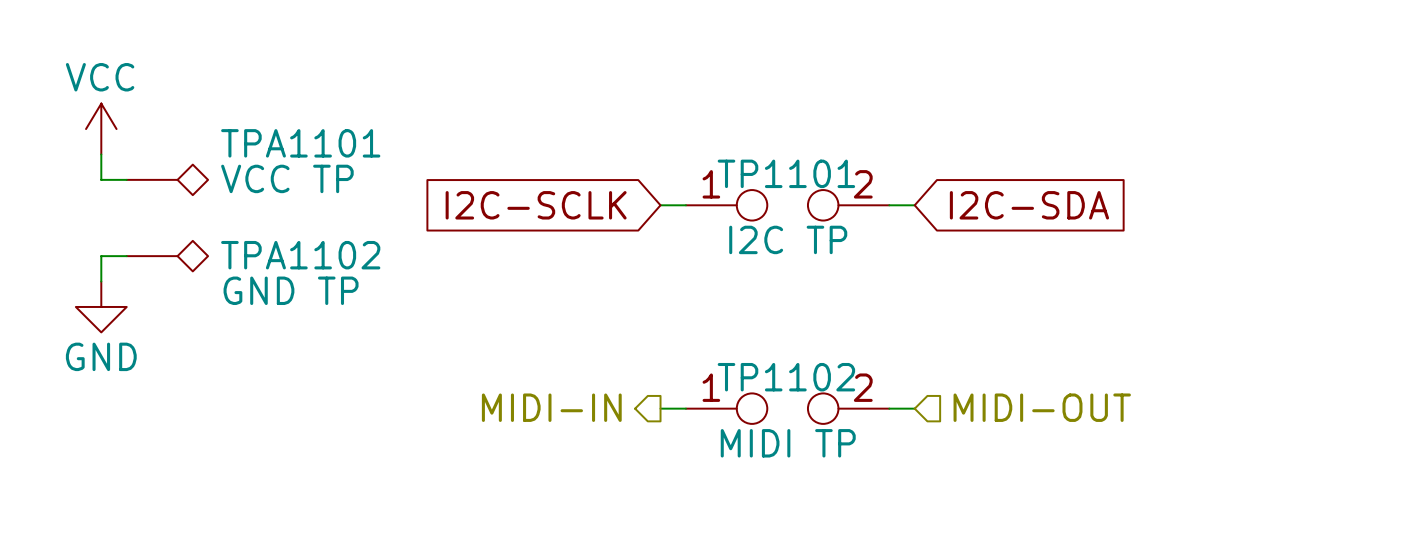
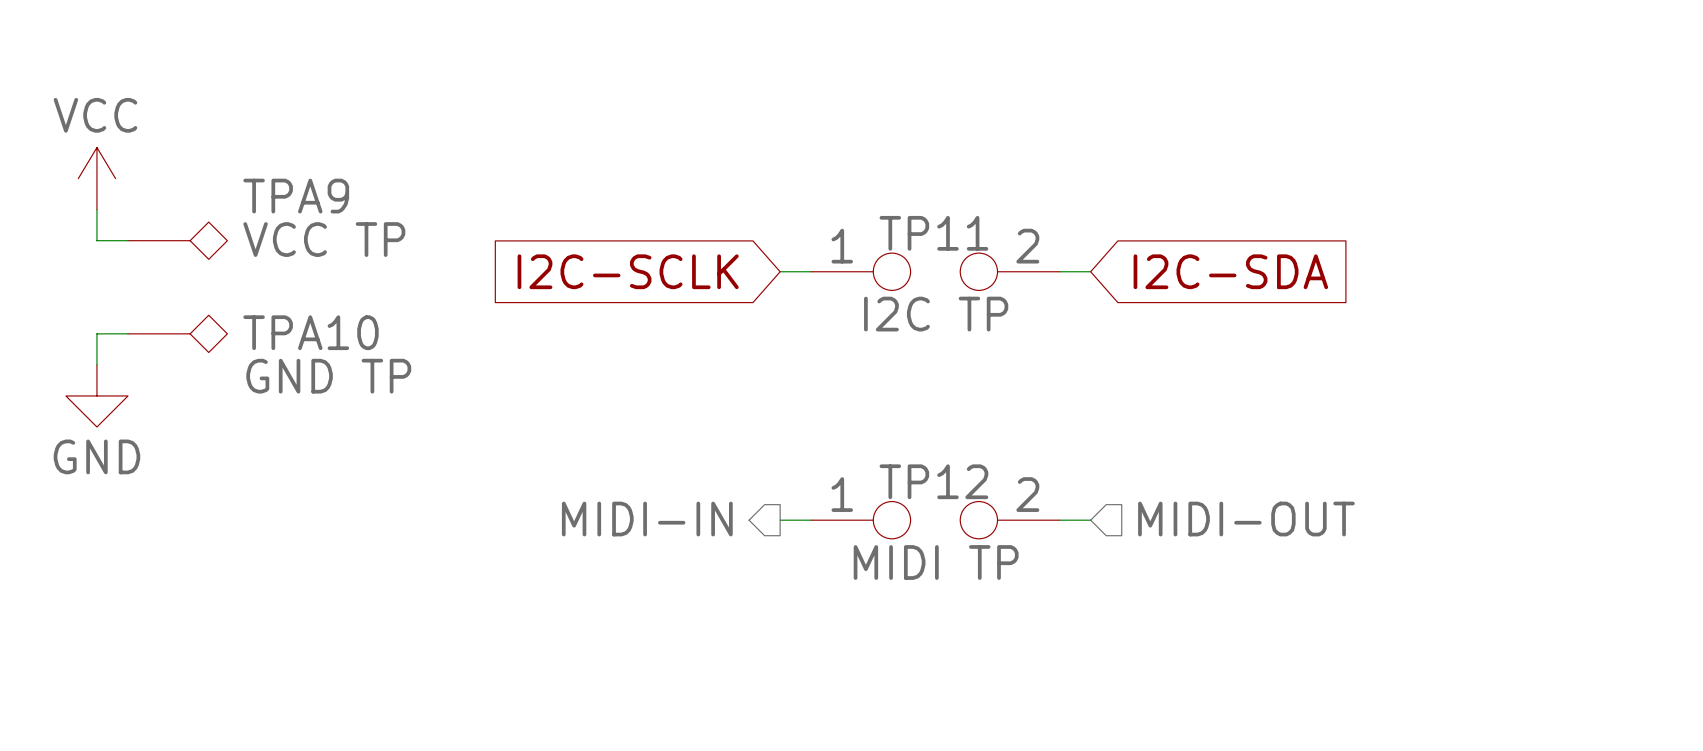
TPA1101 name: TPA1101 (300, 143) -> TPA9 (296, 196)
TP1101 name: TP1101 (786, 173) -> TP11 (933, 233)
TPA1102 name: TPA1102 (300, 255) -> TPA10 (311, 332)
TP1102 name: TP1102 (786, 377) -> TP12 (933, 481)

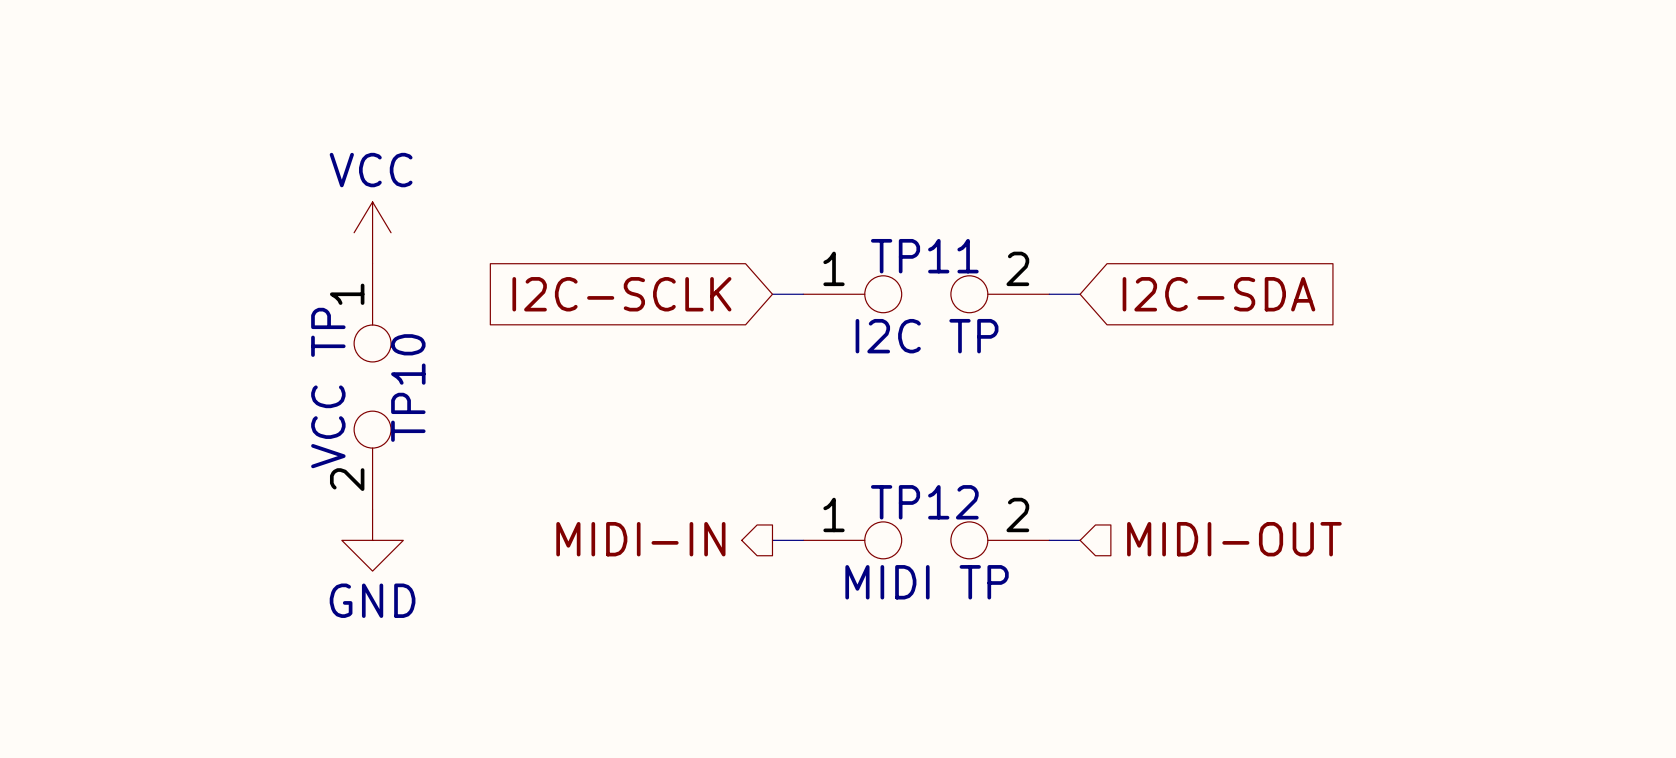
power symbol position: VCC (96, 178) -> VCC (372, 232)
wire: (96, 209) (96, 240) (128, 240) -> none
TPA9: VCC TP (177, 240) -> none
wire: (128, 333) (96, 333) (96, 364) -> none
TPA10: GND TP (177, 333) -> none
TP10: none -> VCC TP (372, 386)
power symbol position: GND (96, 395) -> GND (372, 540)

